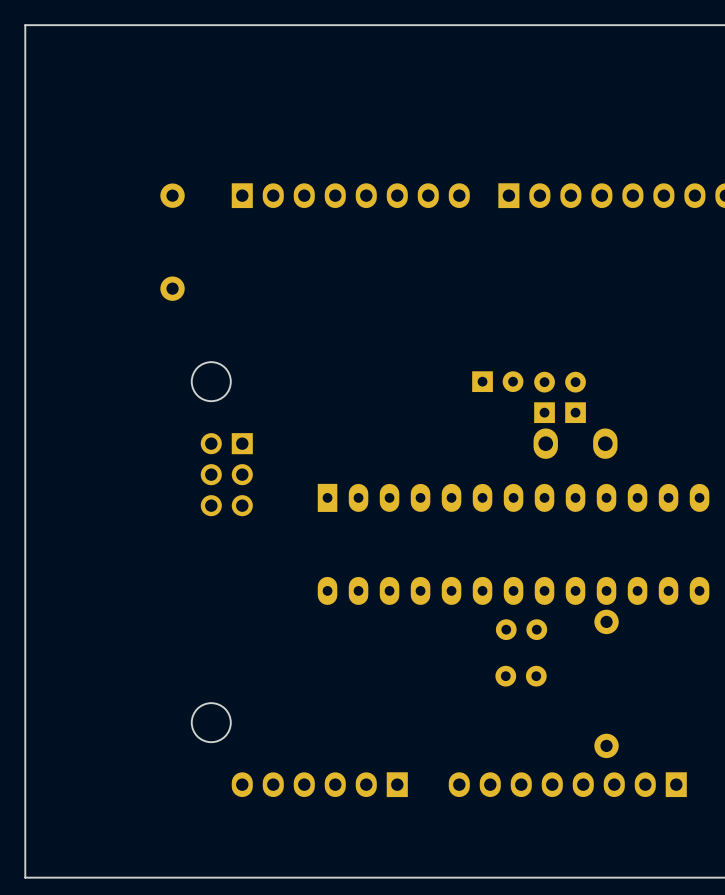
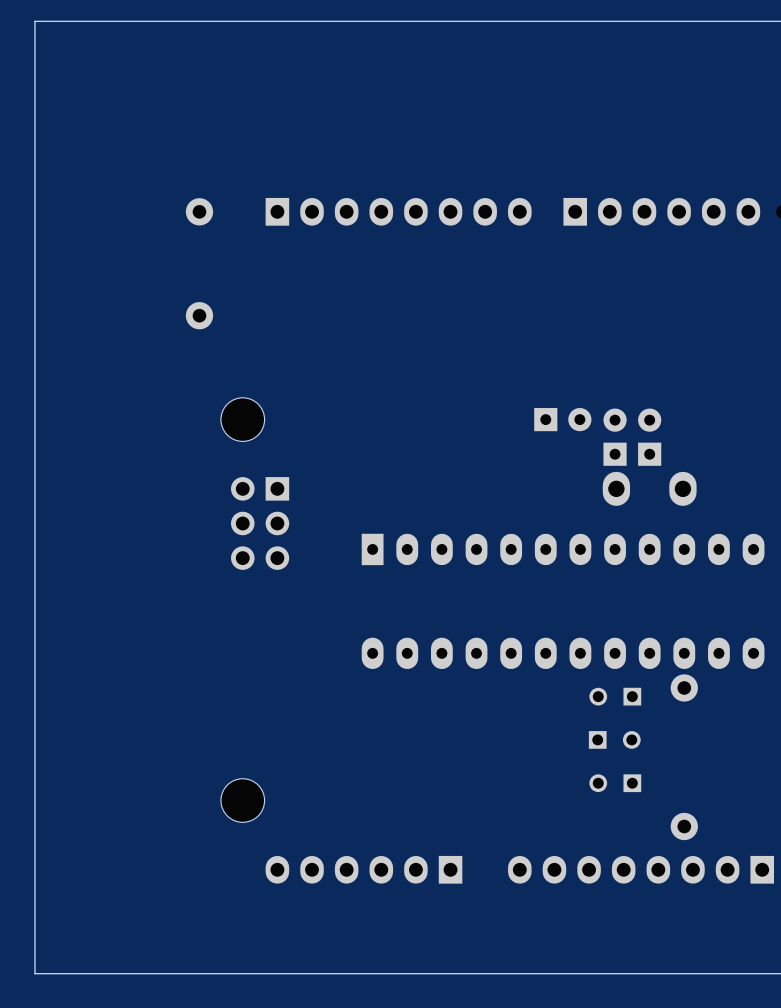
part: (521, 629) -> none
part: none -> (615, 696)
part: none -> (614, 739)
part: (521, 676) -> none
part: none -> (615, 783)

